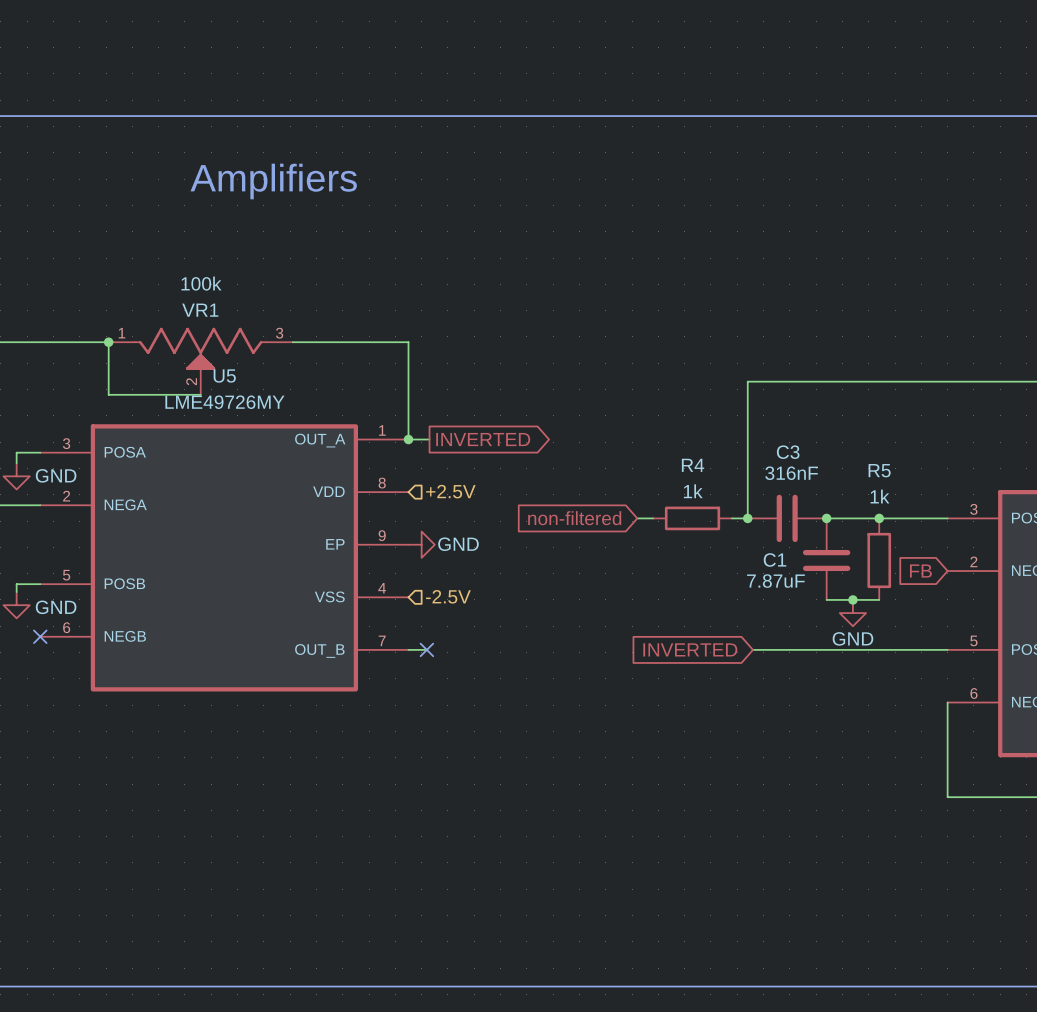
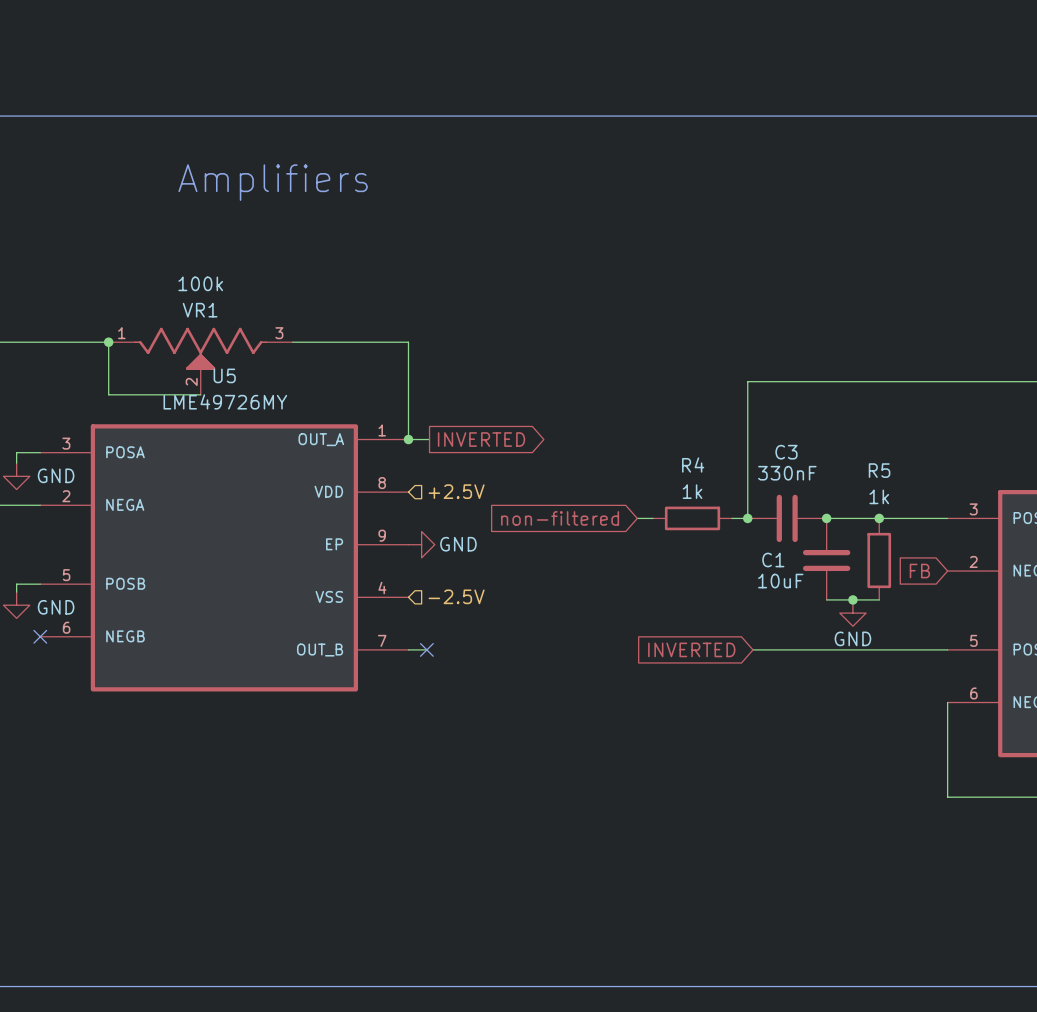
C3 value: 316nF (791, 473) -> 330nF (787, 473)
C1 value: 7.87uF (775, 581) -> 10uF (780, 581)

